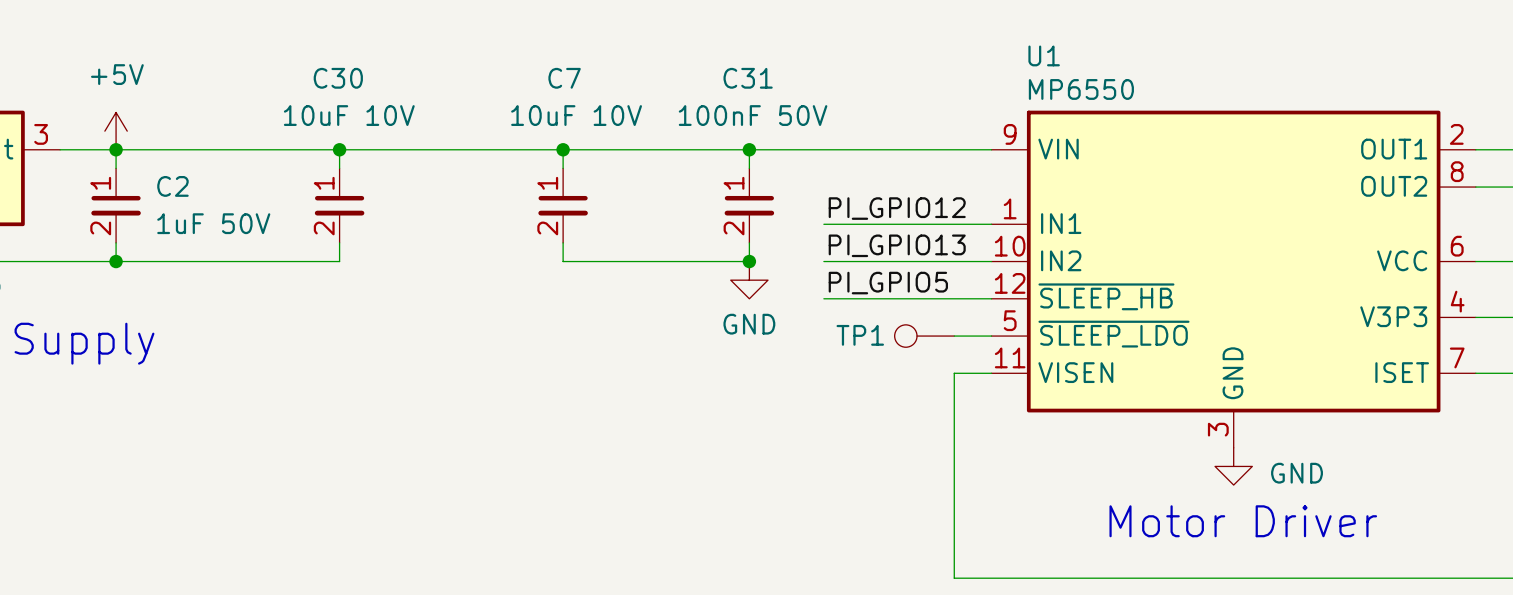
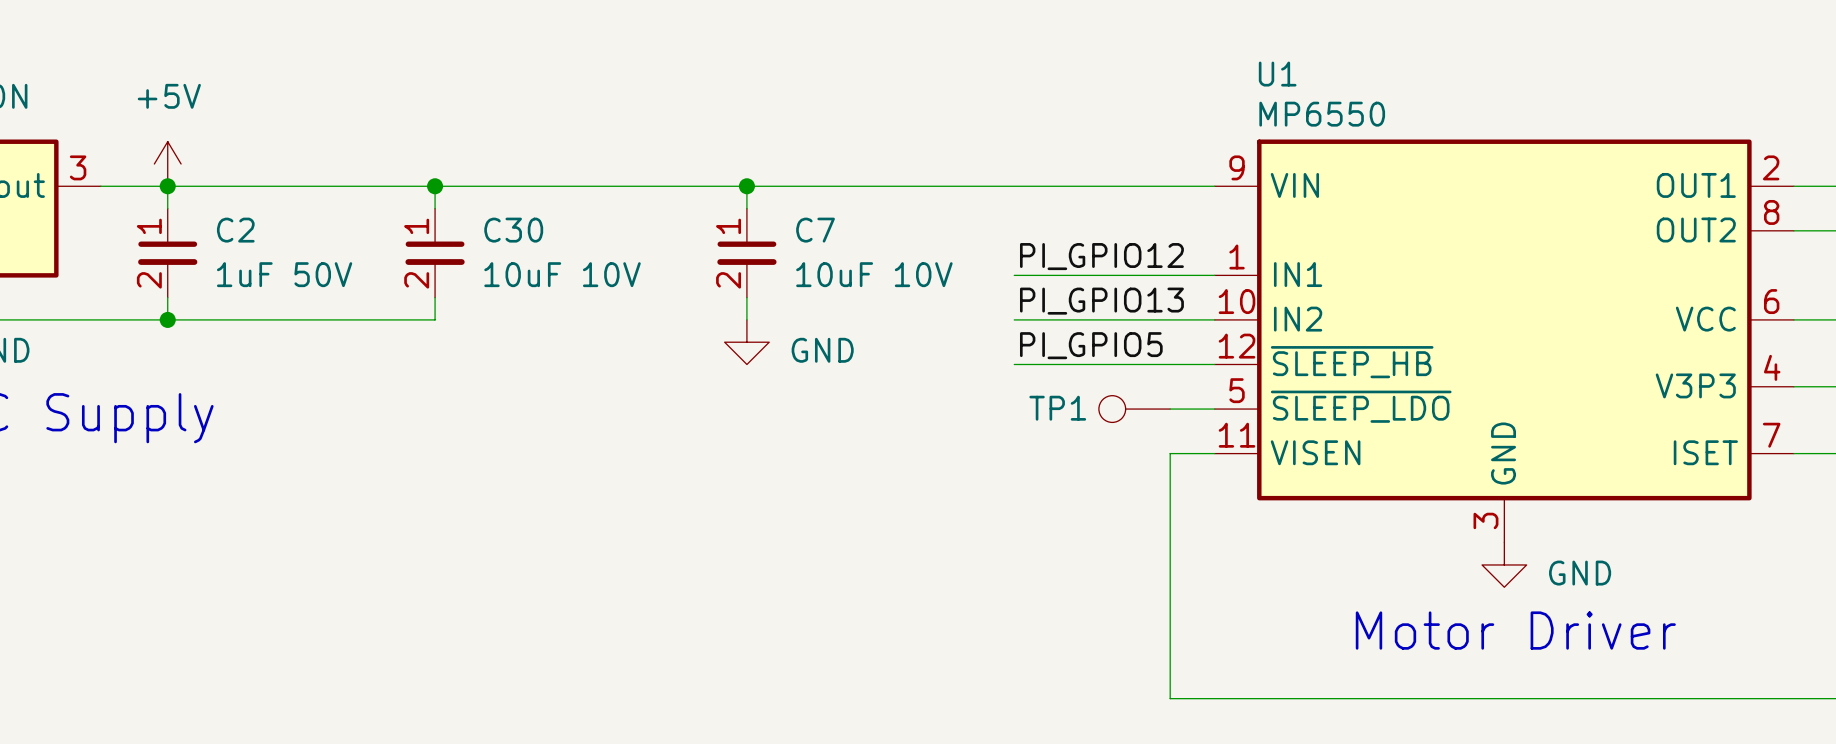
C30 name position: C30 (338, 78) -> C30 (513, 230)
C7 name position: C7 (564, 78) -> C7 (815, 230)
C30 value position: 10uF 10V (349, 115) -> 10uF 10V (562, 274)
C7 value position: 10uF 10V (576, 115) -> 10uF 10V (874, 274)
wire: (563, 149) (563, 168) -> (746, 186) (746, 208)
junction position: (563, 149) -> (746, 186)
wire: (749, 149) (749, 168) -> (746, 297) (746, 319)
junction: (749, 149) -> none
C7 position: (563, 205) -> (746, 253)
C31: 100nF 50V (749, 205) -> none
wire: (563, 242) (563, 261) (749, 261) (749, 242) -> none
junction: (749, 261) -> none
power symbol position: GND (749, 280) -> GND (746, 342)
power symbol text position: GND (749, 324) -> GND (822, 350)

